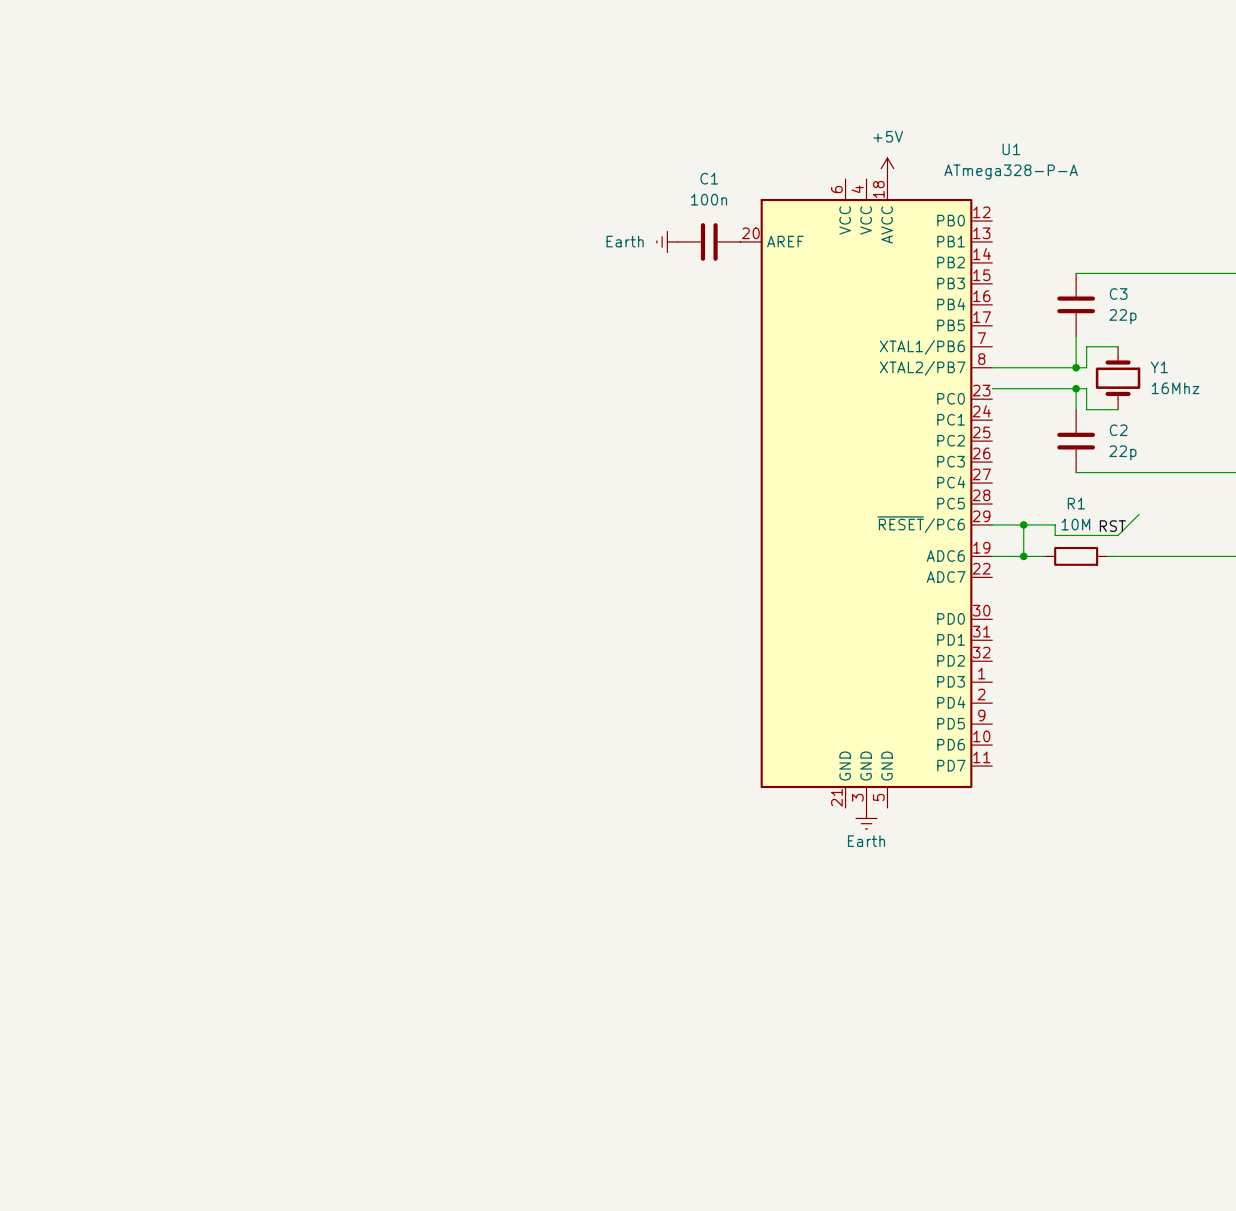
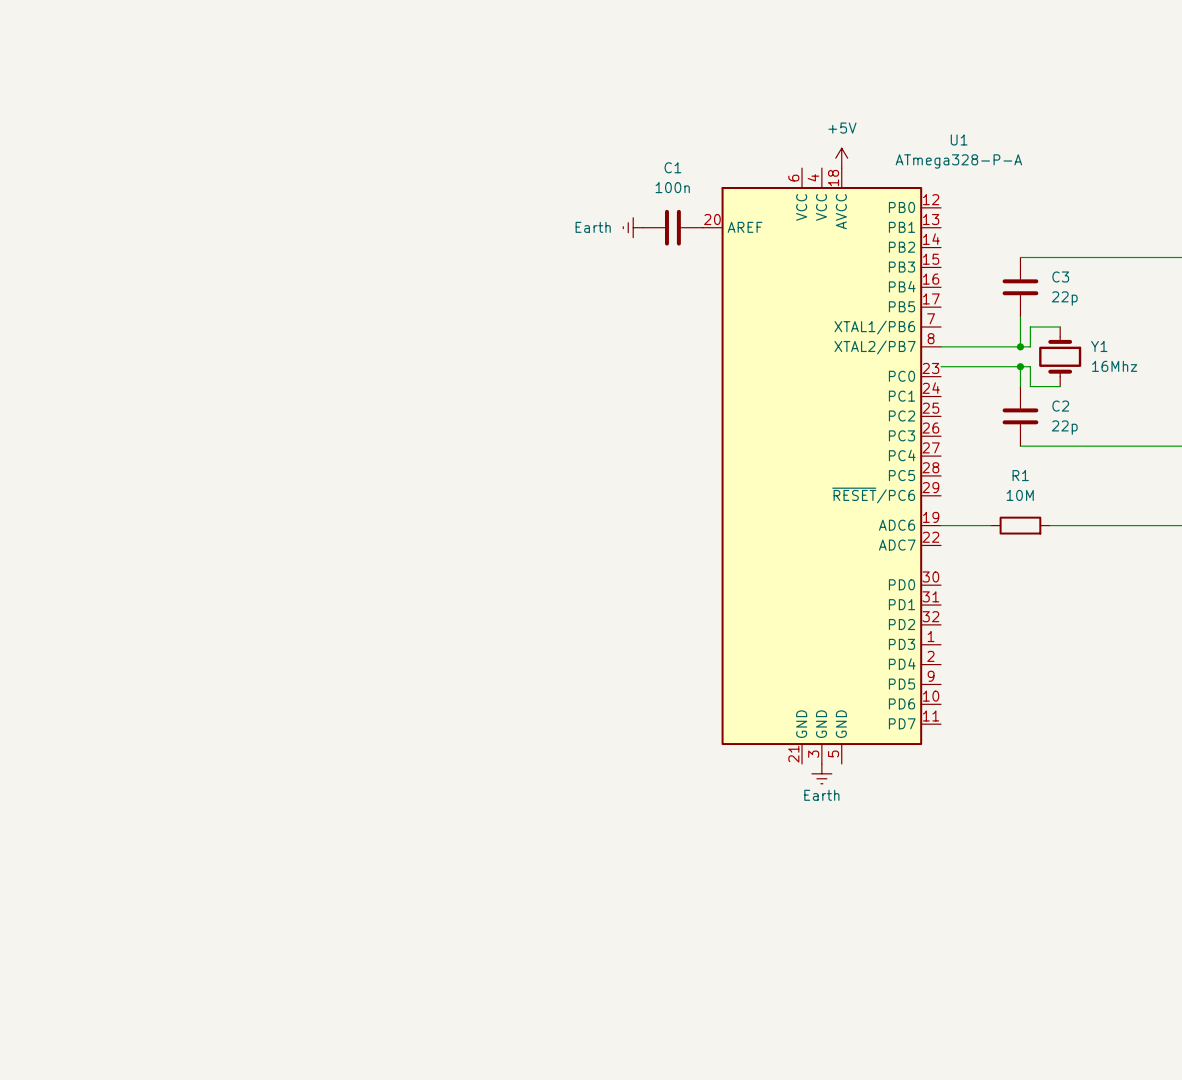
wire: (1139, 514) (1118, 535) (1055, 535) (1055, 524) (992, 524) -> none
wire: (1023, 524) (1023, 556) -> none
junction: (1023, 524) -> none
label: RST (1112, 526) -> none
junction: (1023, 556) -> none

